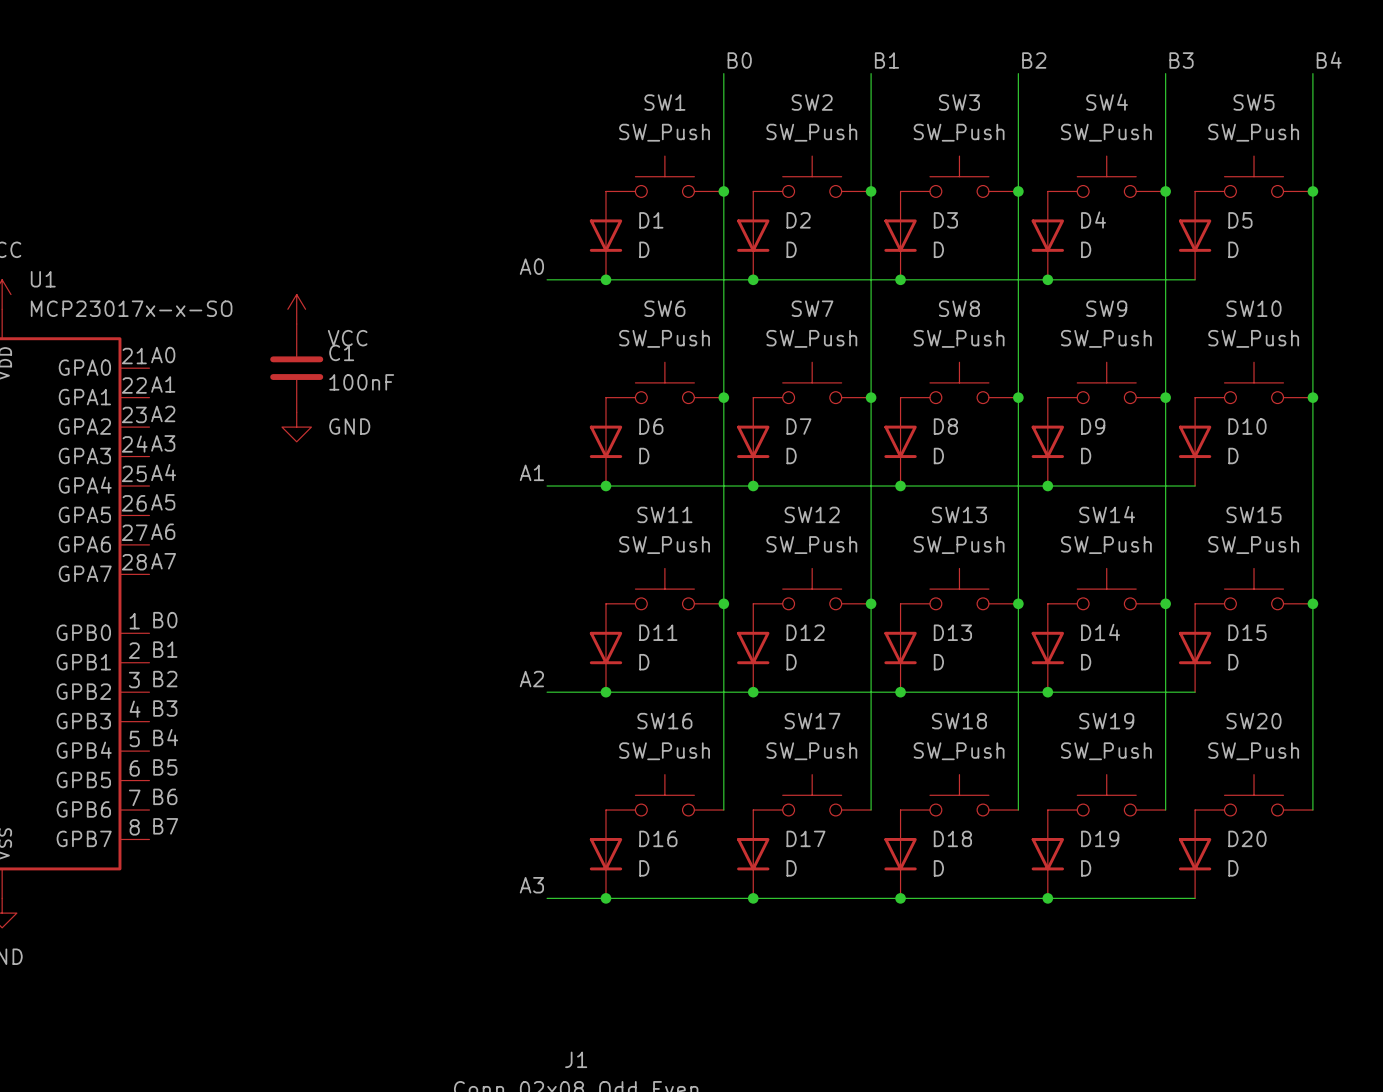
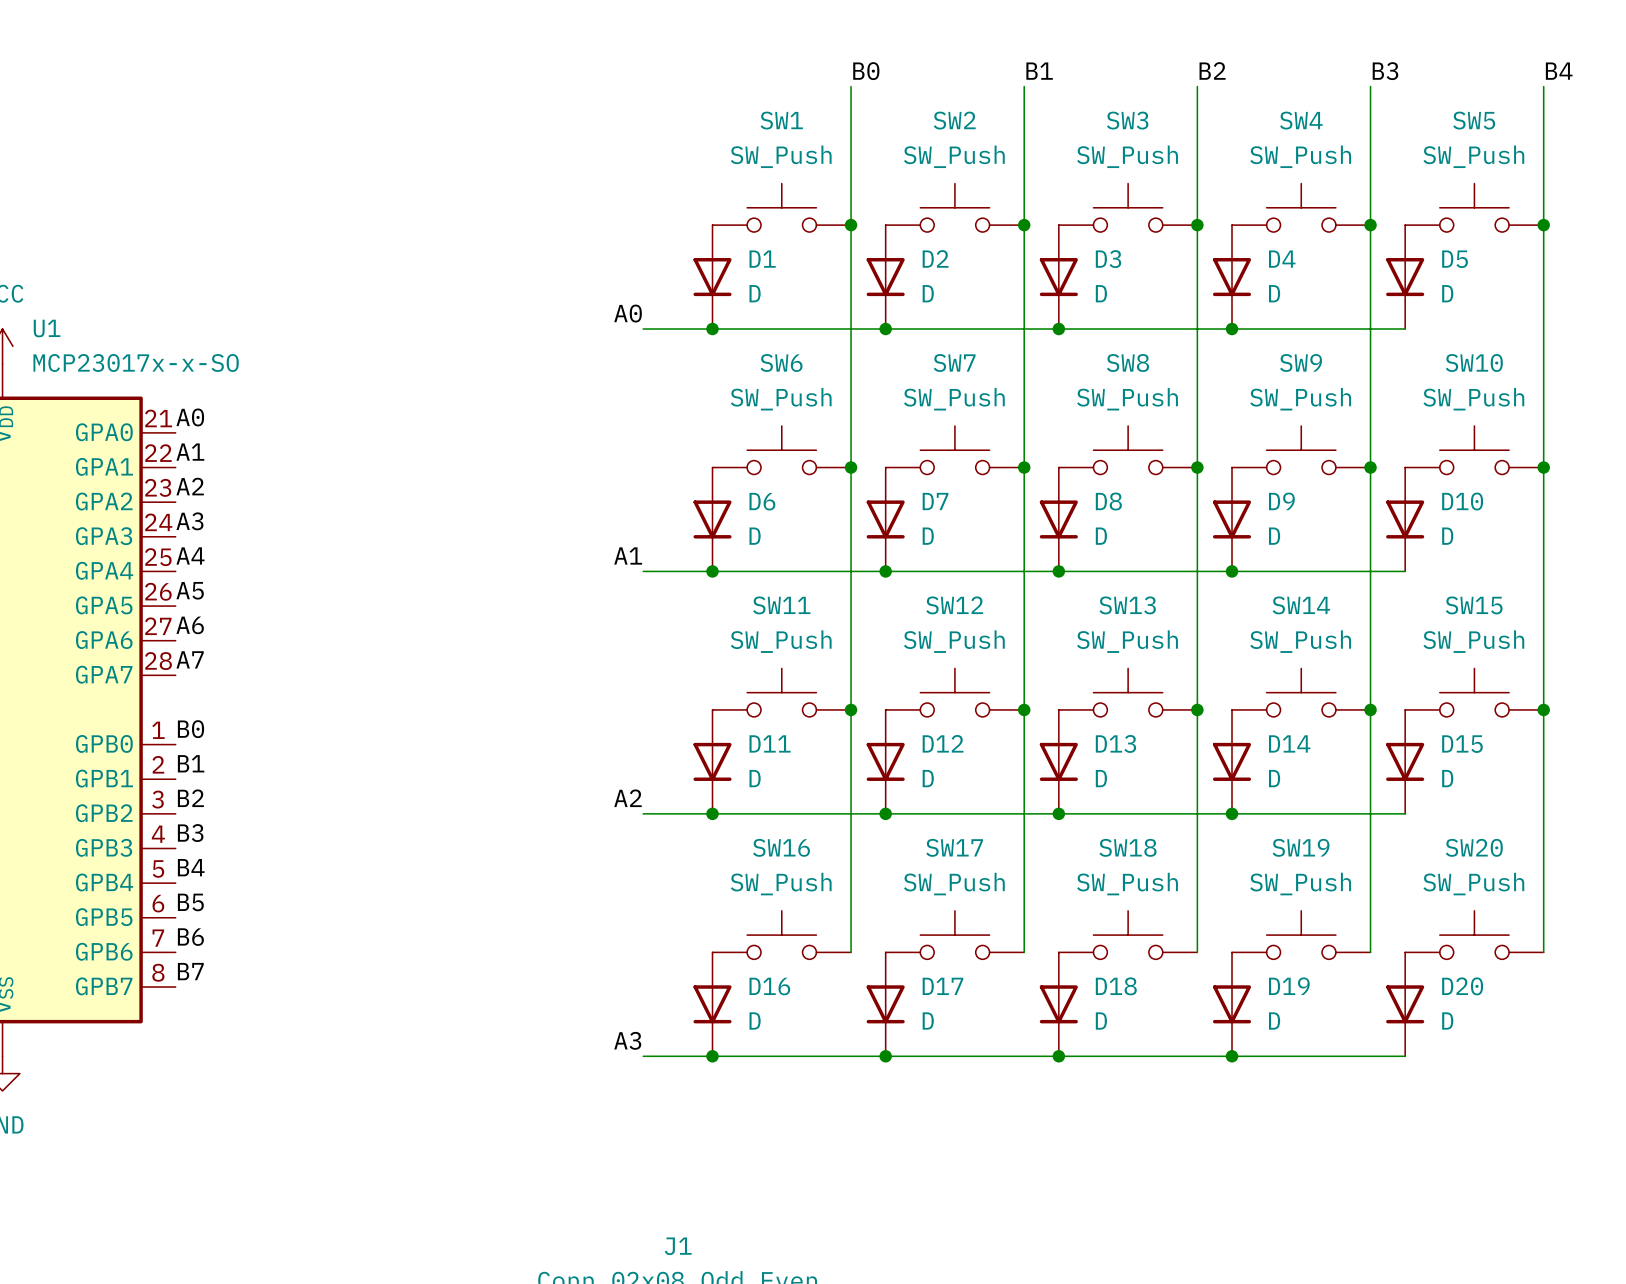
power symbol: VCC (296, 309) -> none
C1: 100nF (296, 368) -> none
power symbol: GND (296, 427) -> none

